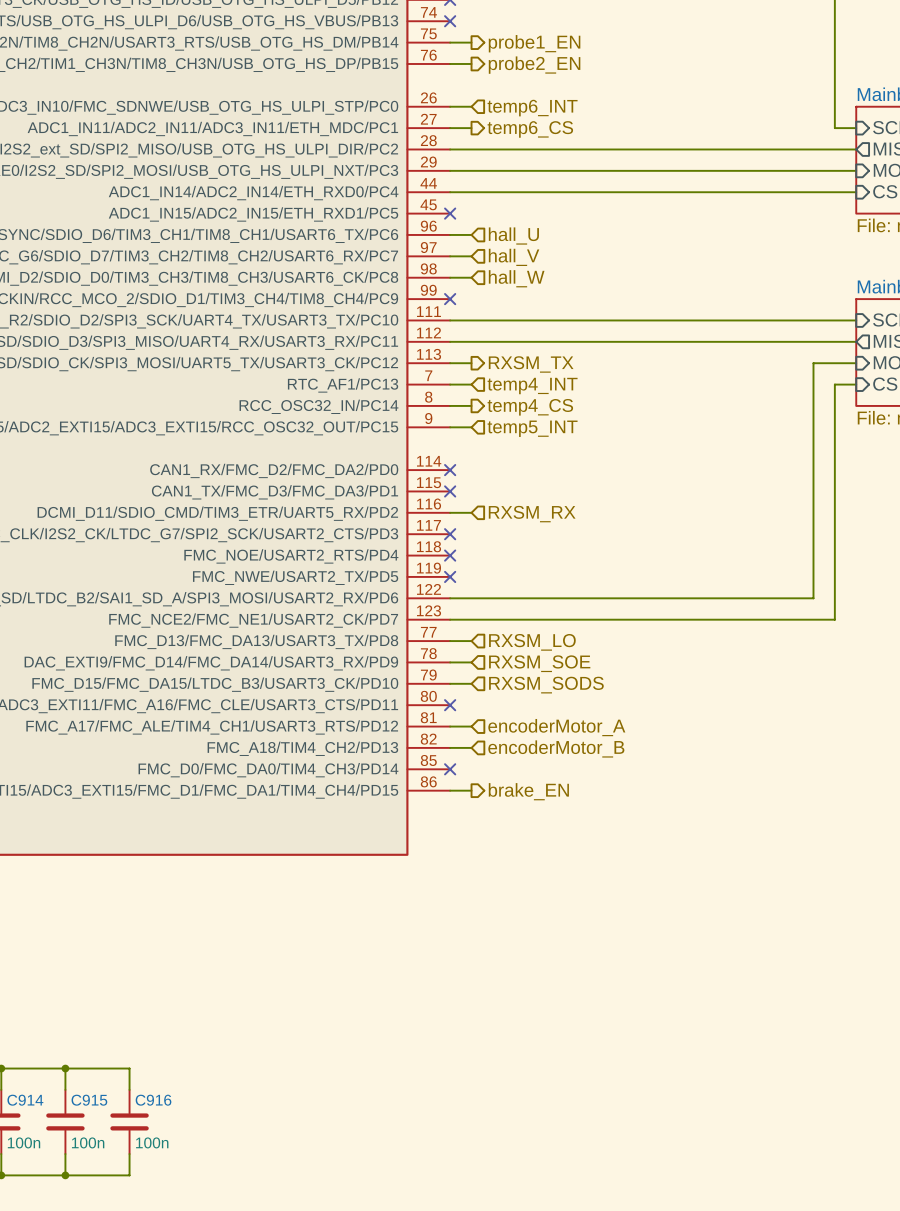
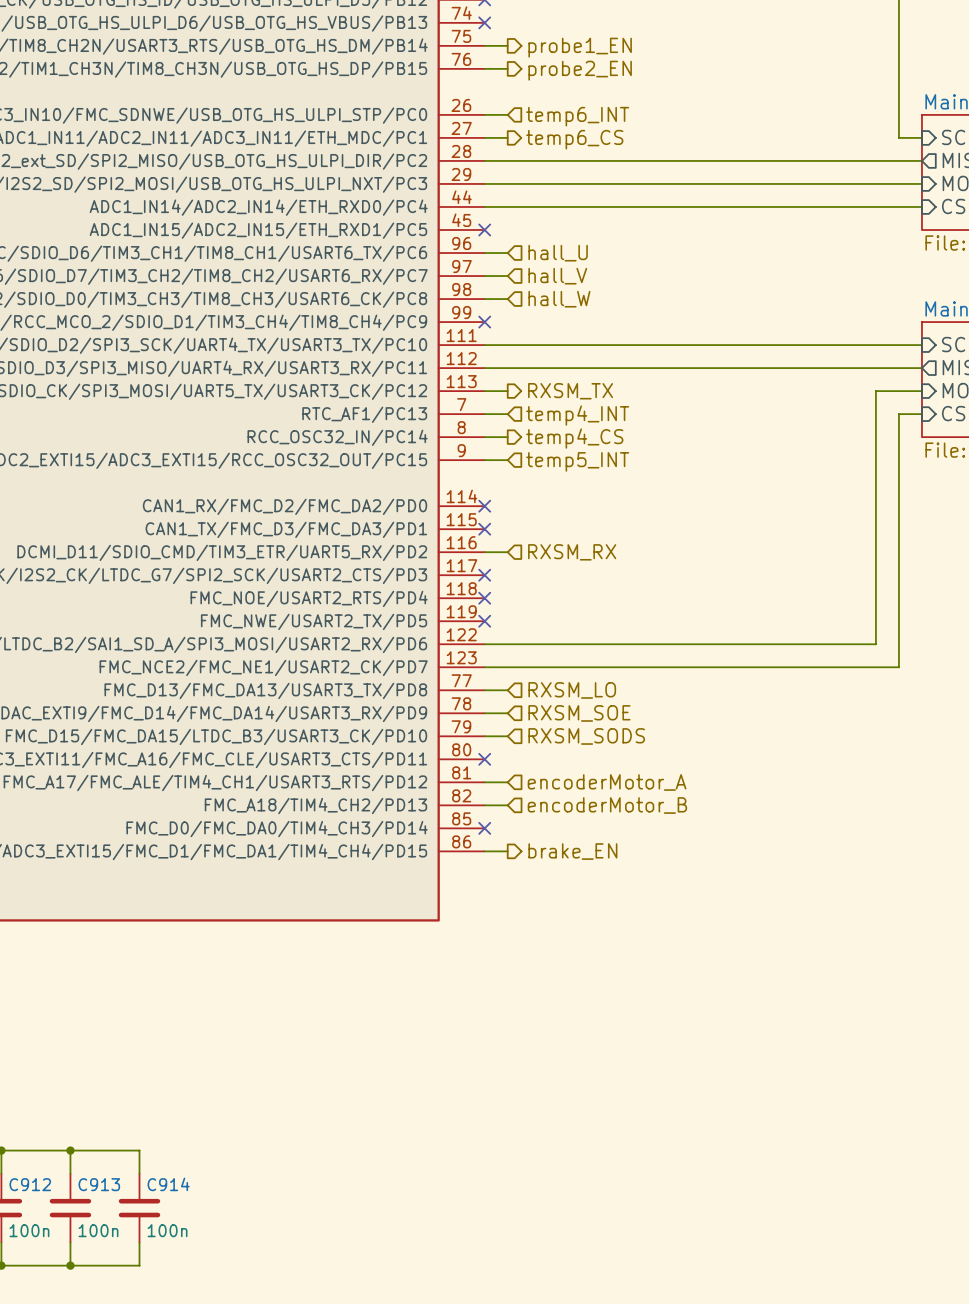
C914 name: C914 (25, 1100) -> C912 (30, 1184)
C915 name: C915 (89, 1100) -> C913 (99, 1184)
C916 name: C916 (153, 1100) -> C914 (168, 1184)

